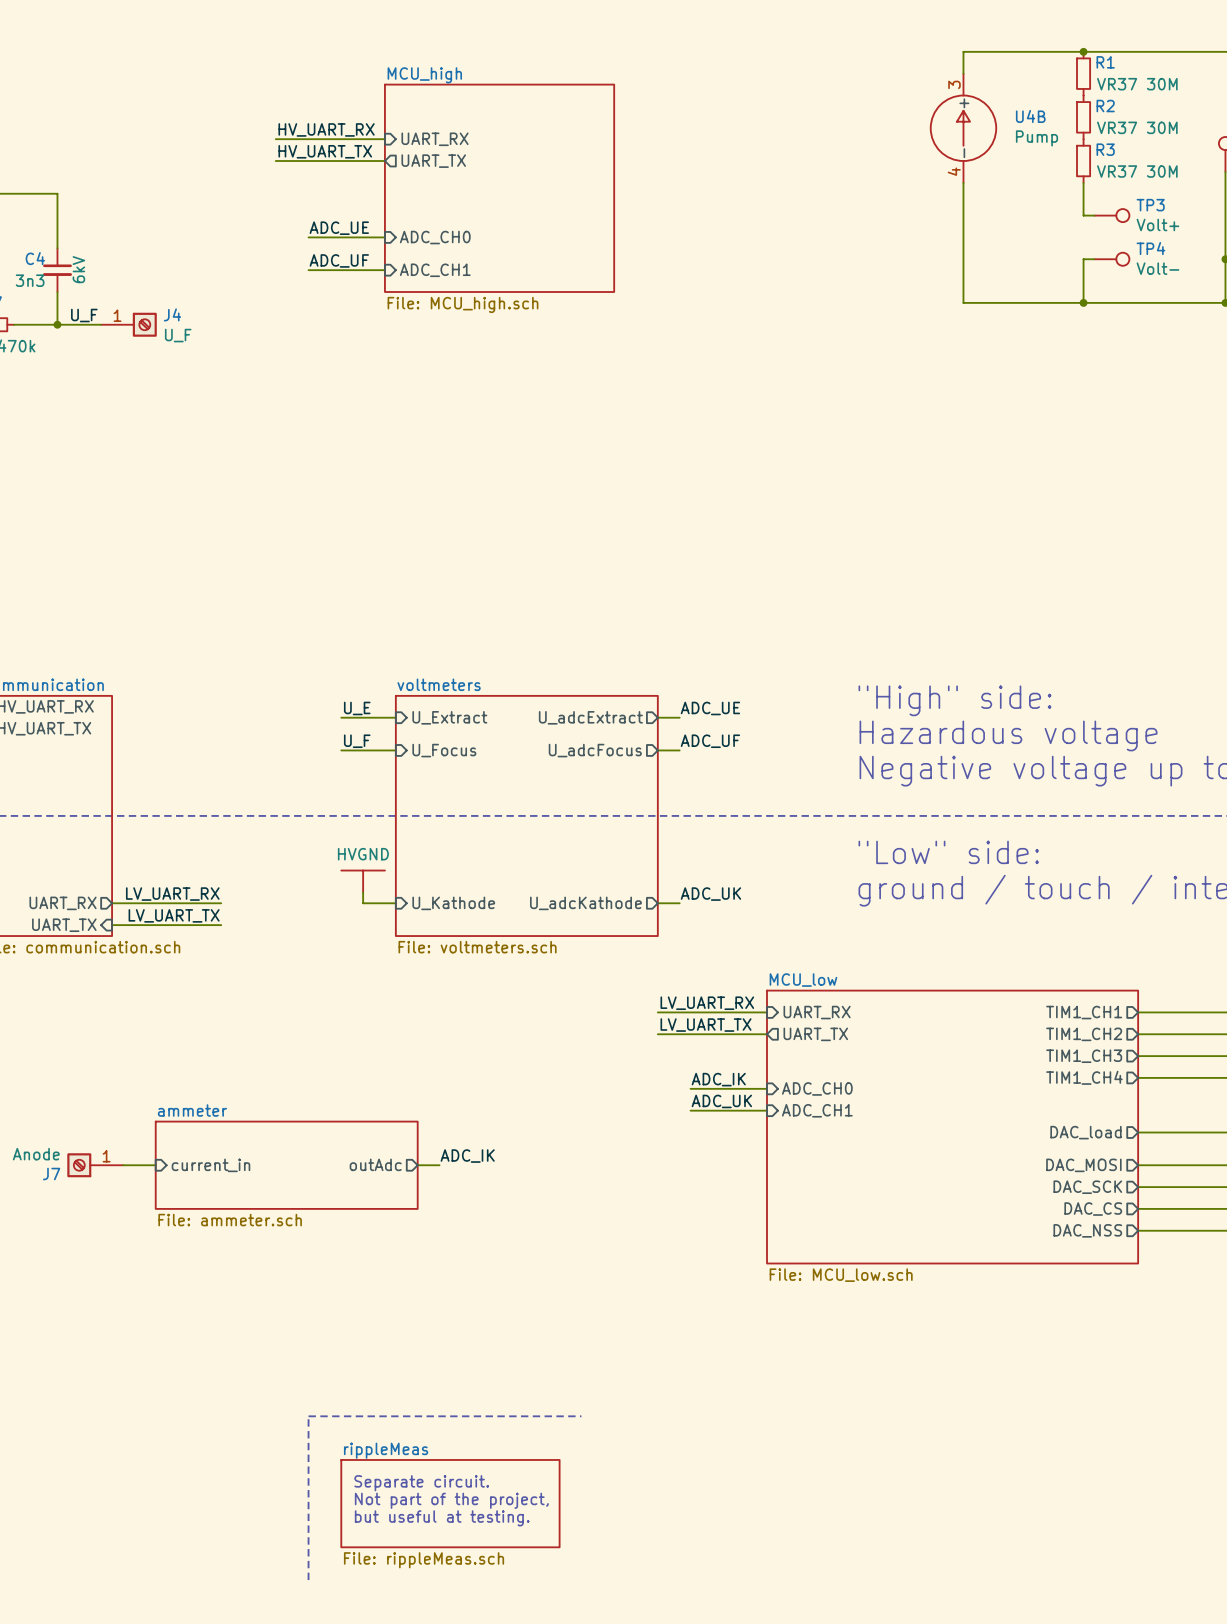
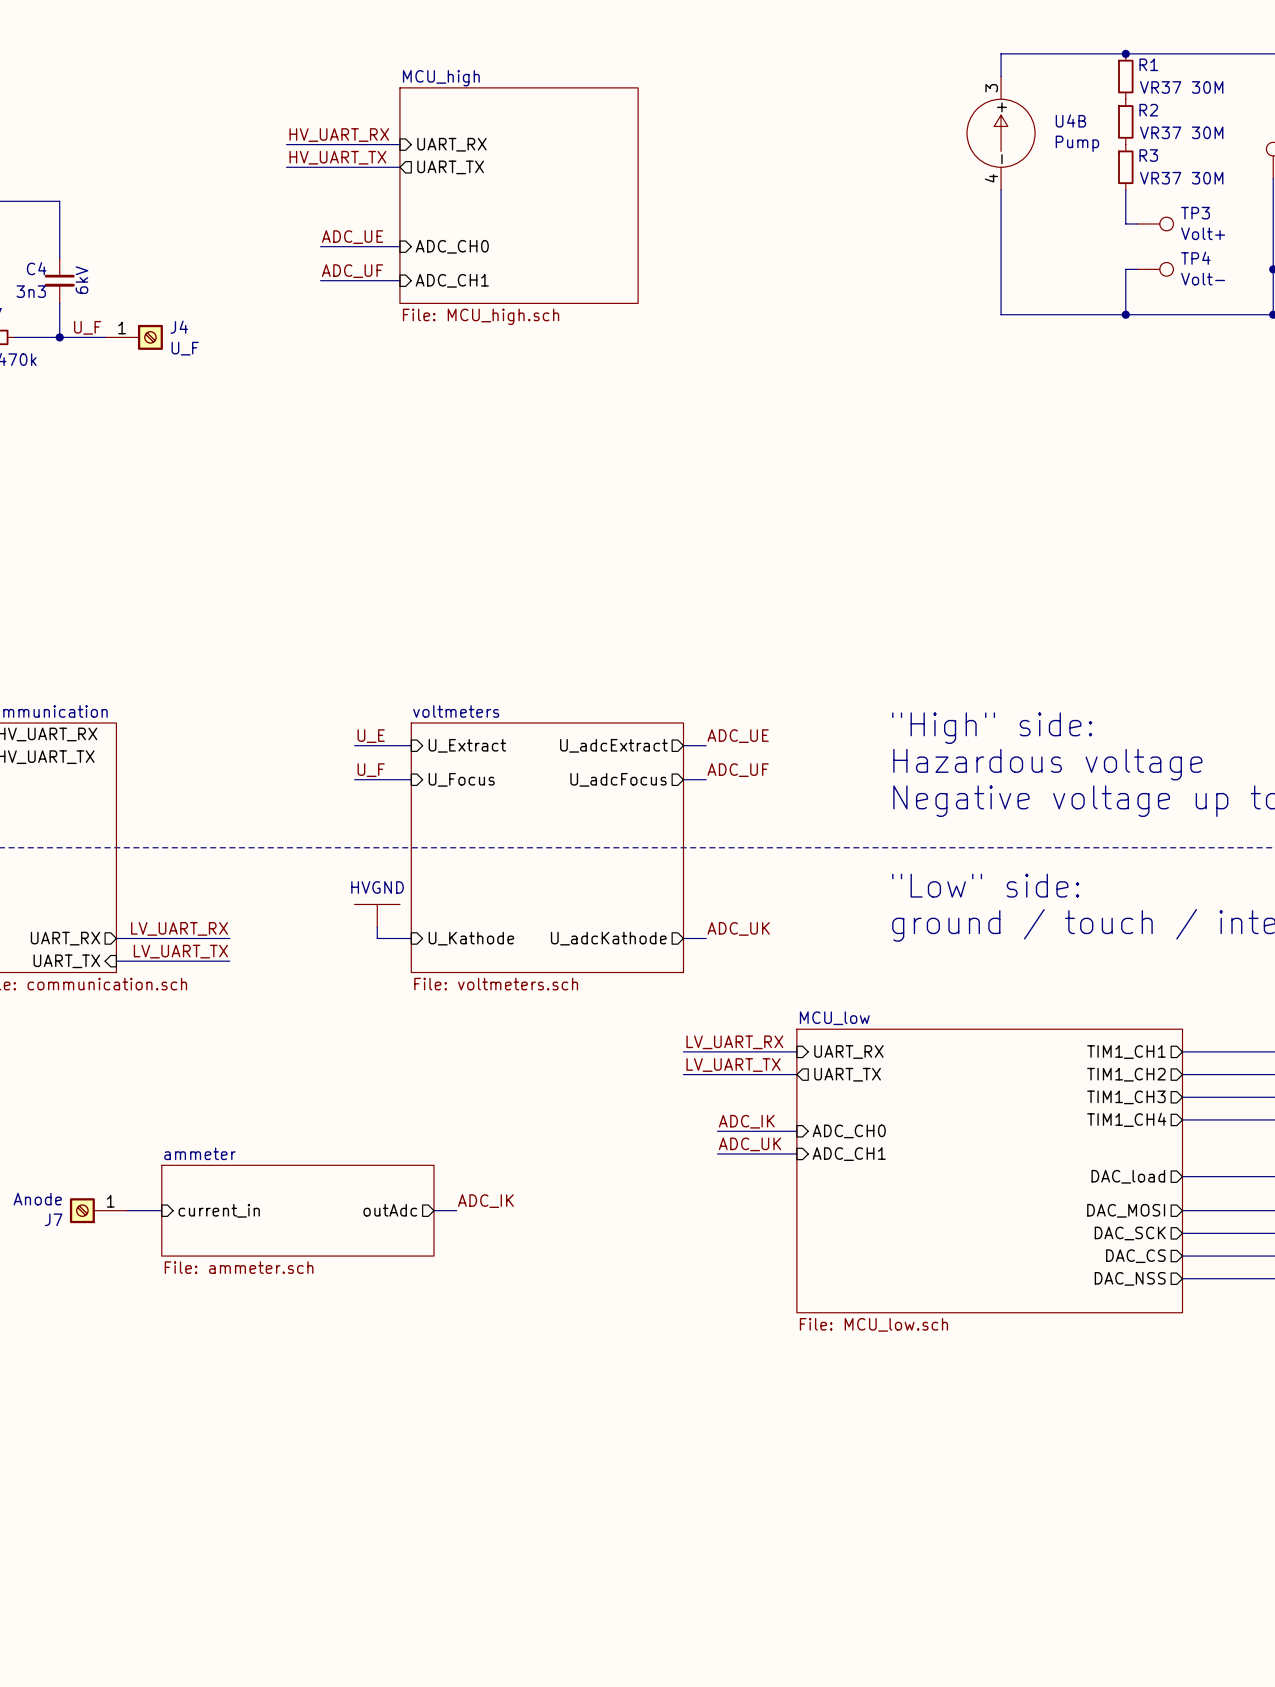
line: (581, 1416) (308, 1416) (308, 1580) -> none
text: Separate circuit. (421, 1483) -> none
text: Not part of the project, (451, 1500) -> none
sheet rippleMeas: File: rippleMeas.sch (450, 1503) -> none
text: but useful at testing. (442, 1518) -> none

